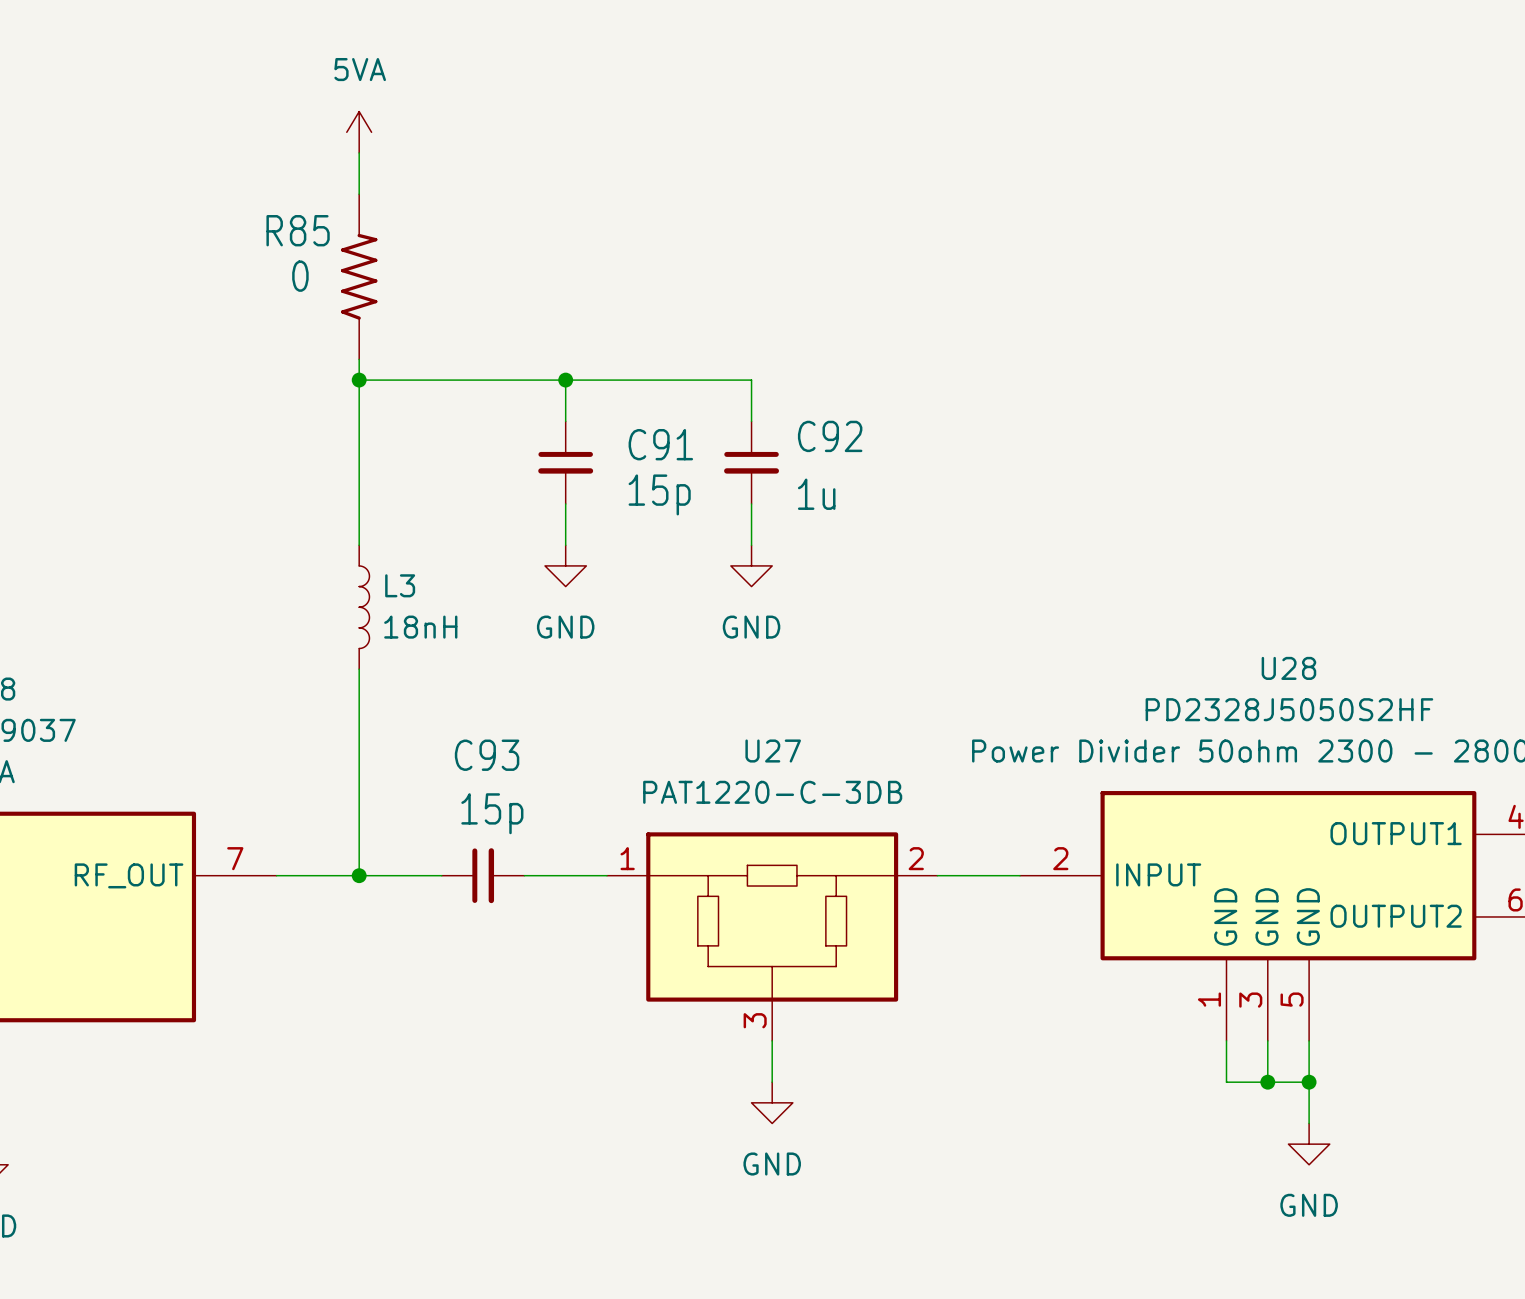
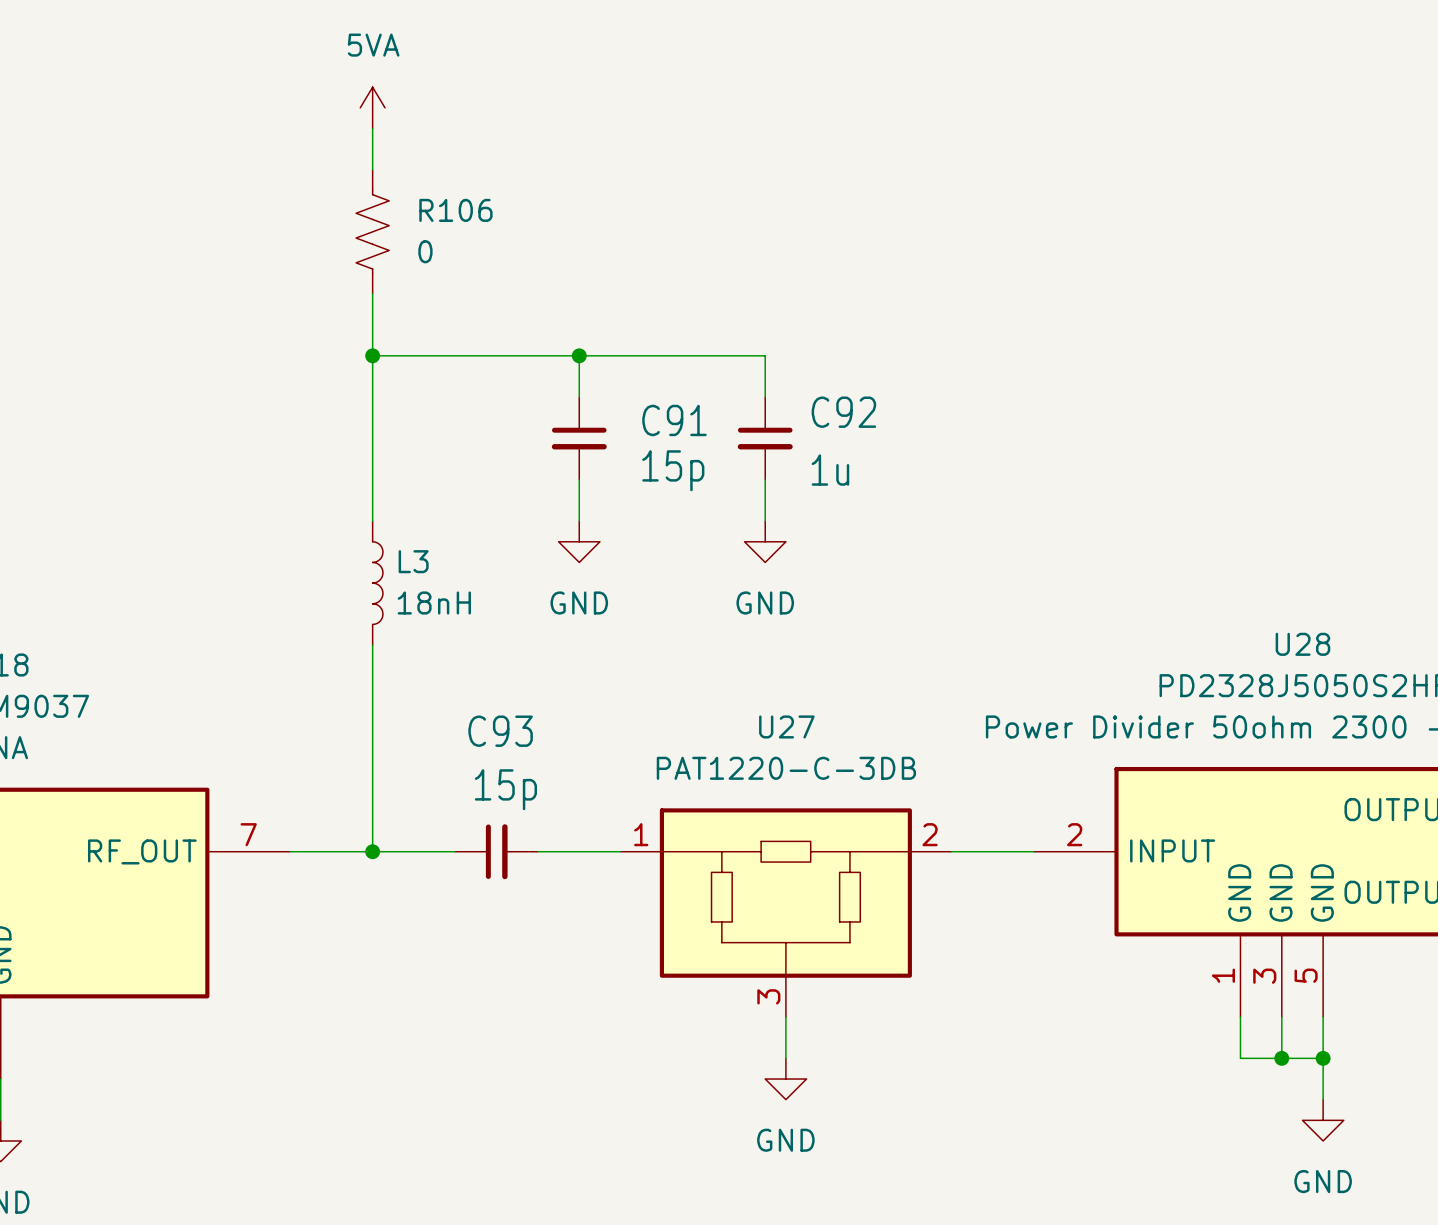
R106: none -> 0 (372, 231)
R85: 0 (359, 276) -> none

